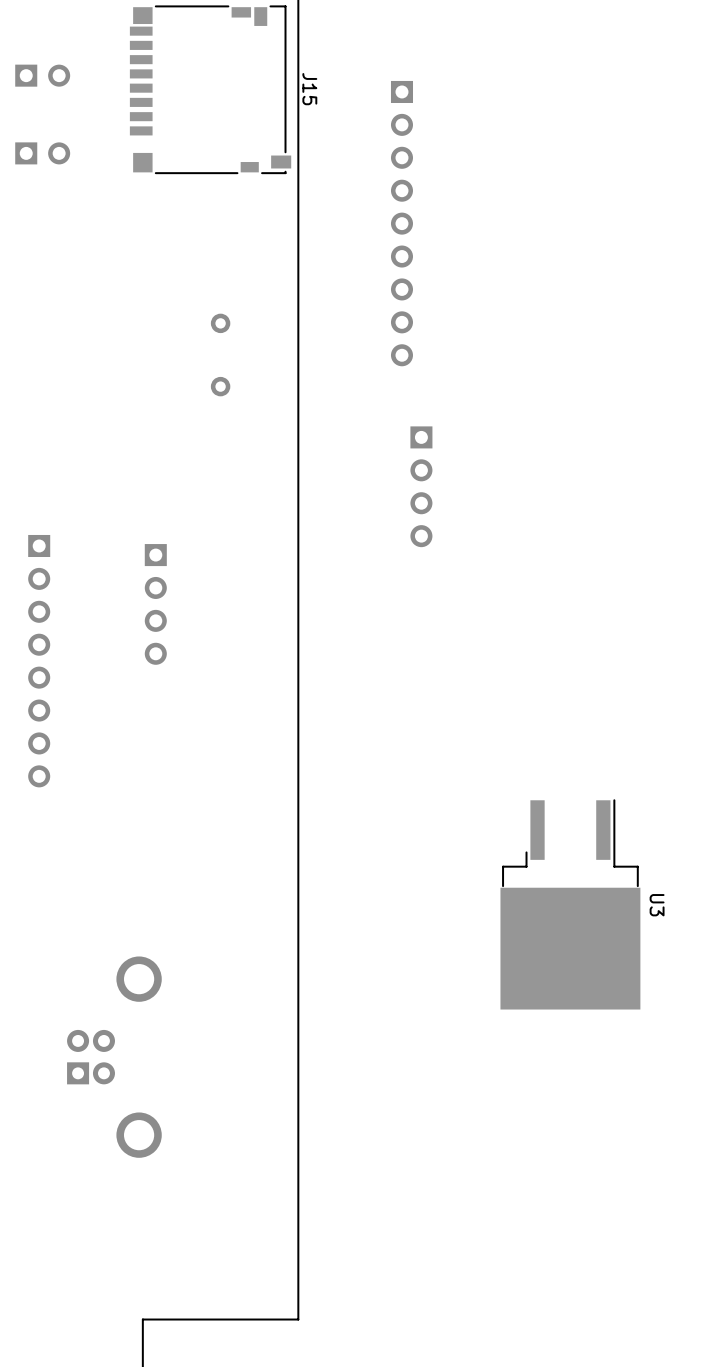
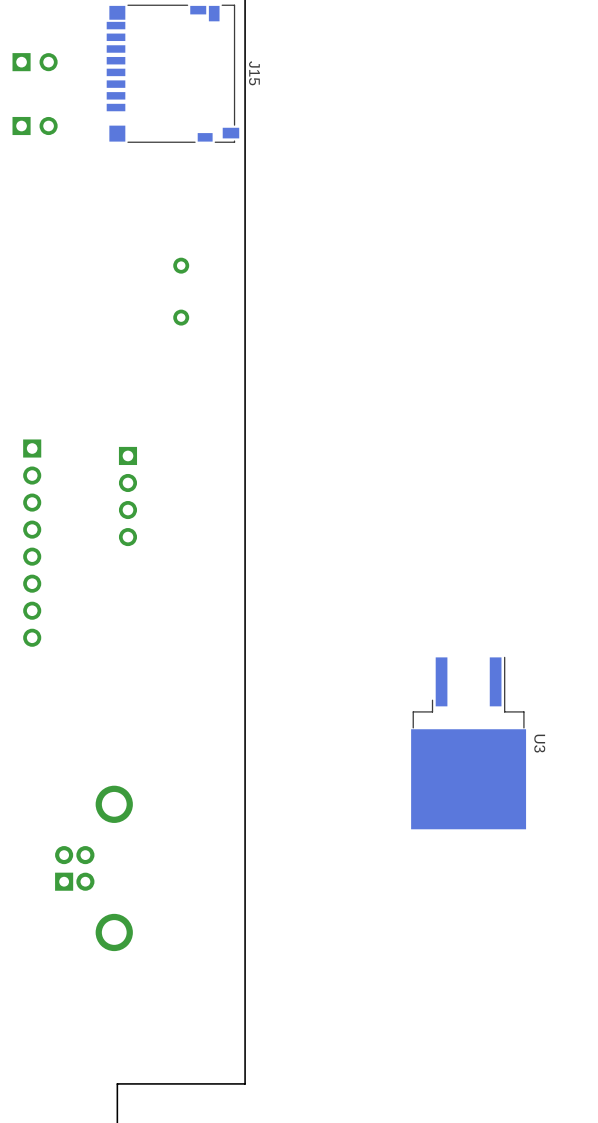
part: (401, 223) -> none
part: (421, 486) -> none

